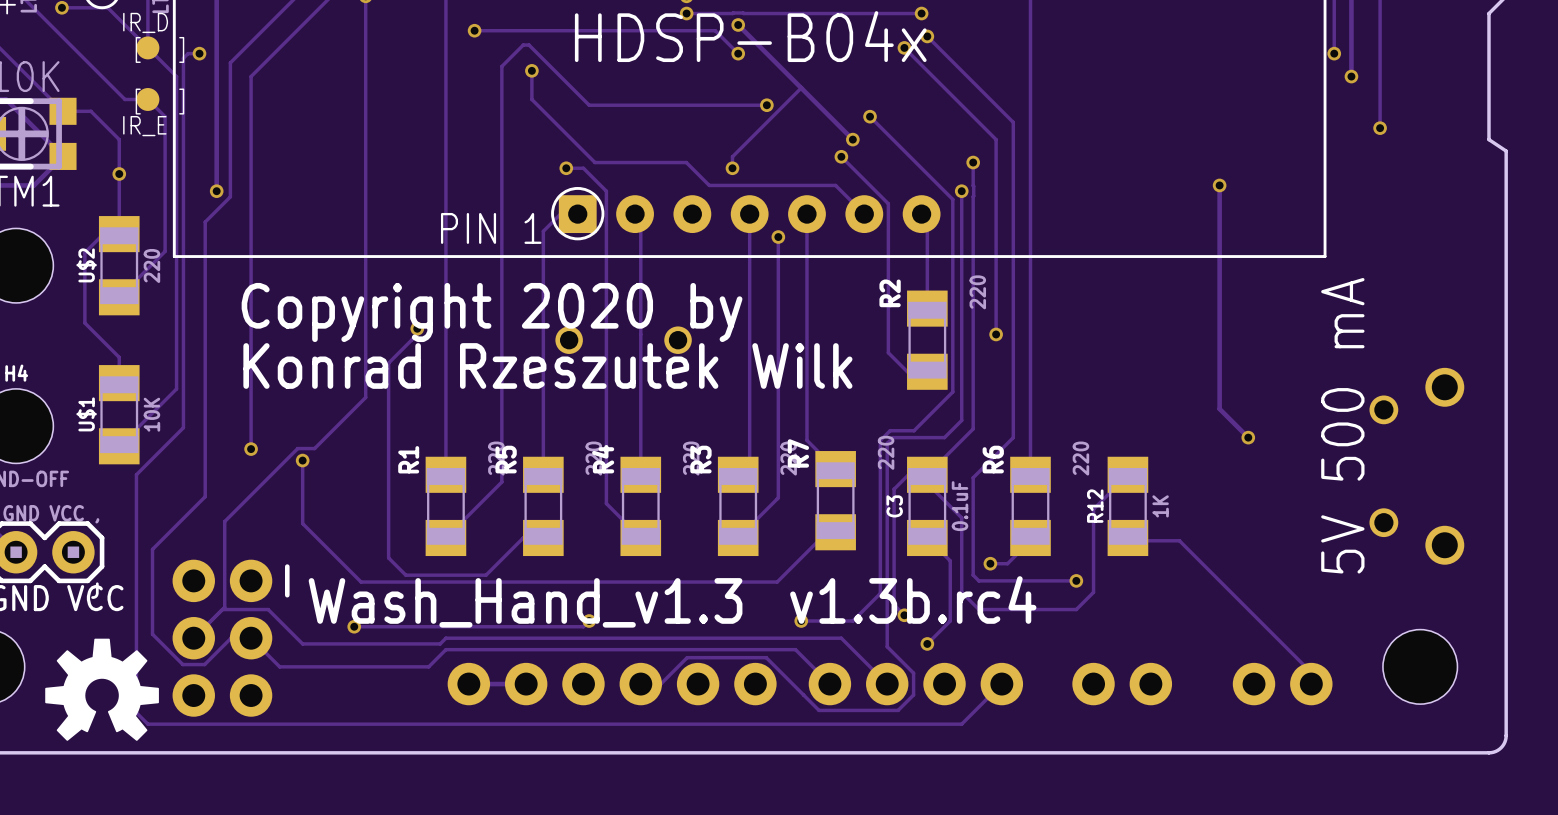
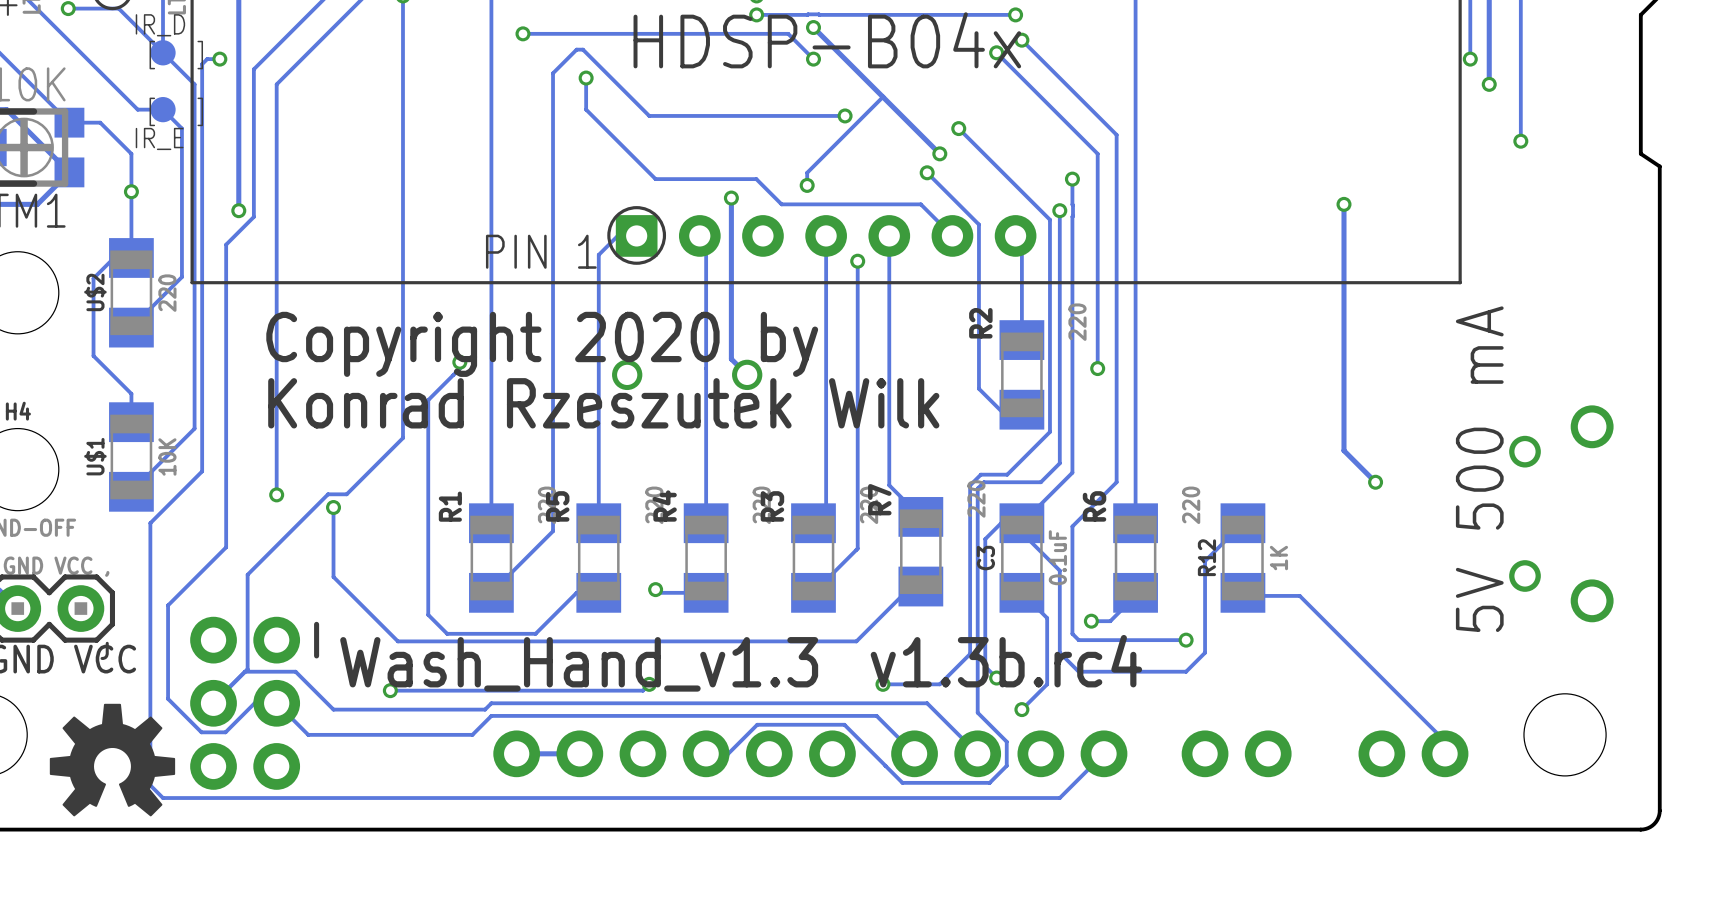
track: (566, 168) (583, 168) (606, 191) (606, 503) (640, 537) -> (655, 589) (658, 592) (706, 592)
via position: (566, 168) -> (731, 198)
track: none -> (731, 198) (731, 359) (747, 374)
via: none -> (655, 589)

